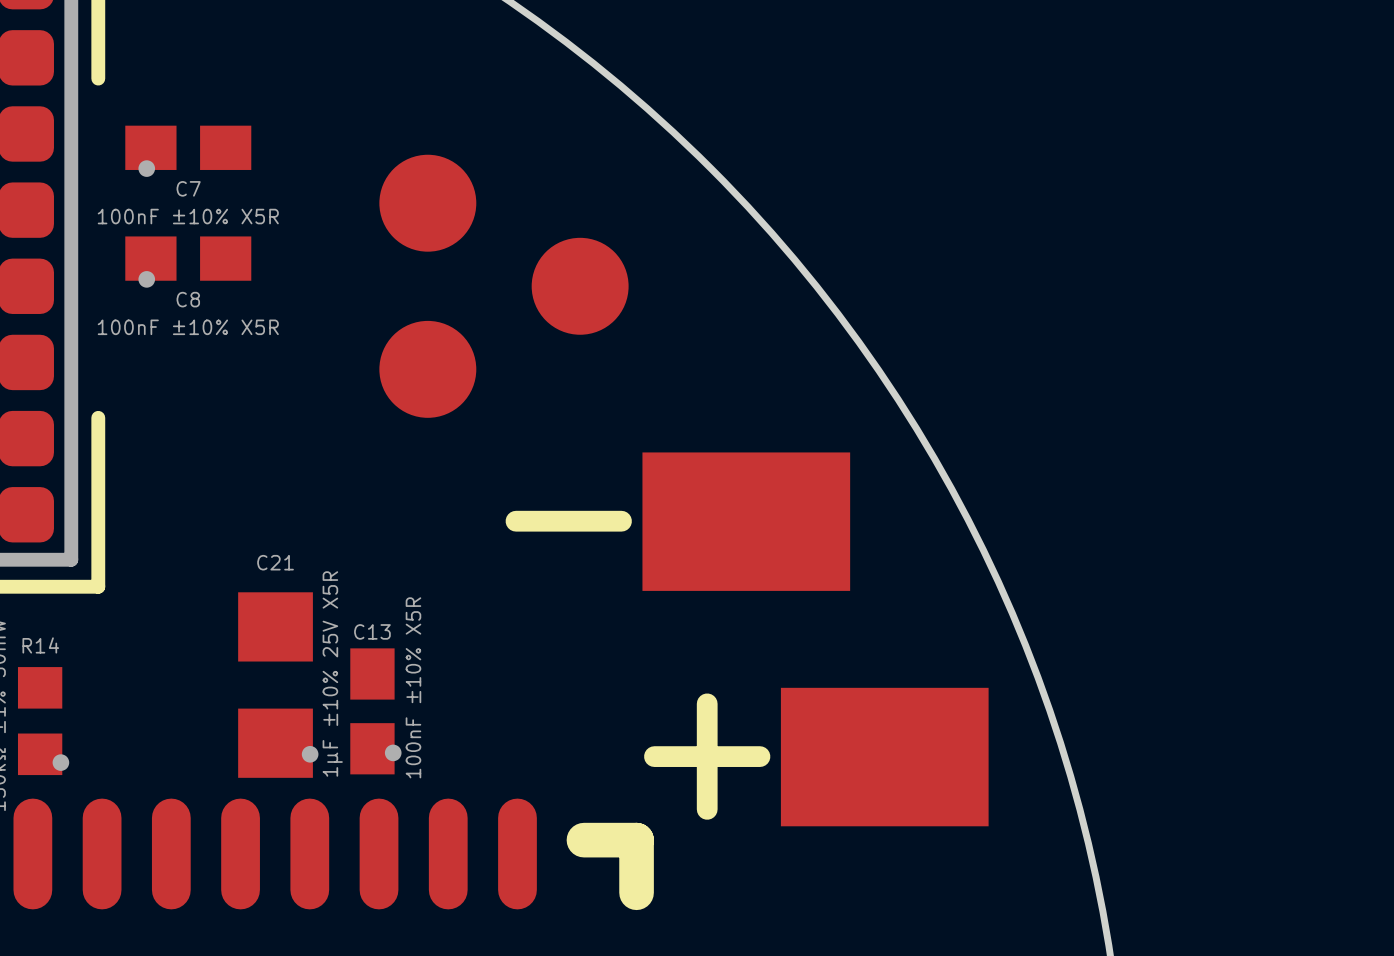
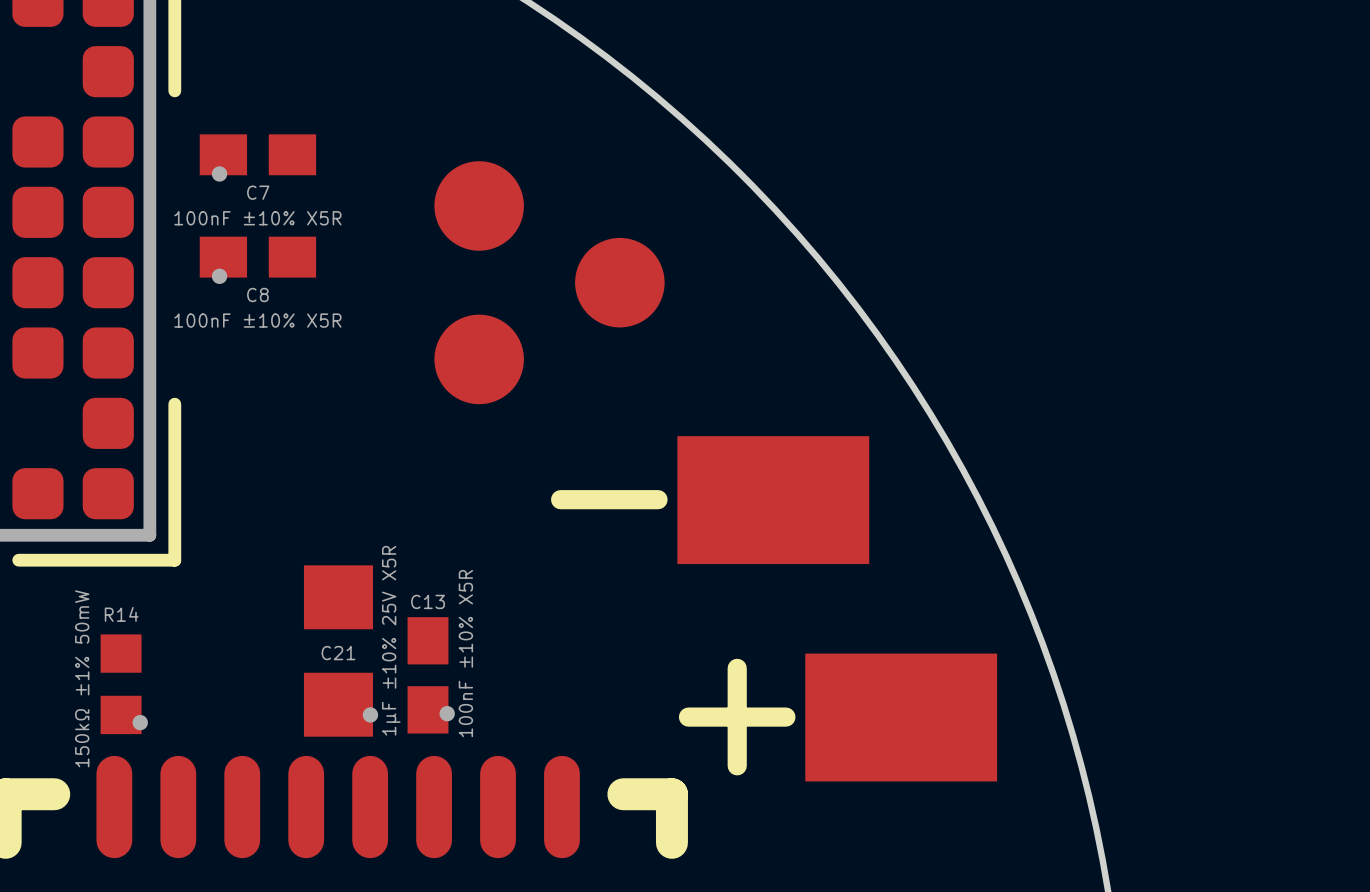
C21 name position: C21 (275, 562) -> C21 (338, 653)

